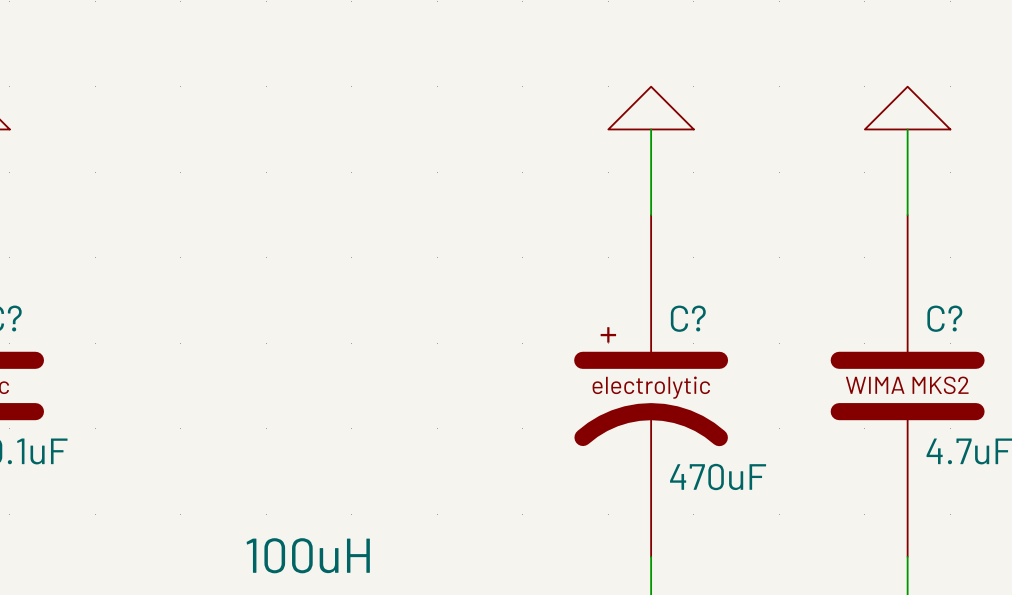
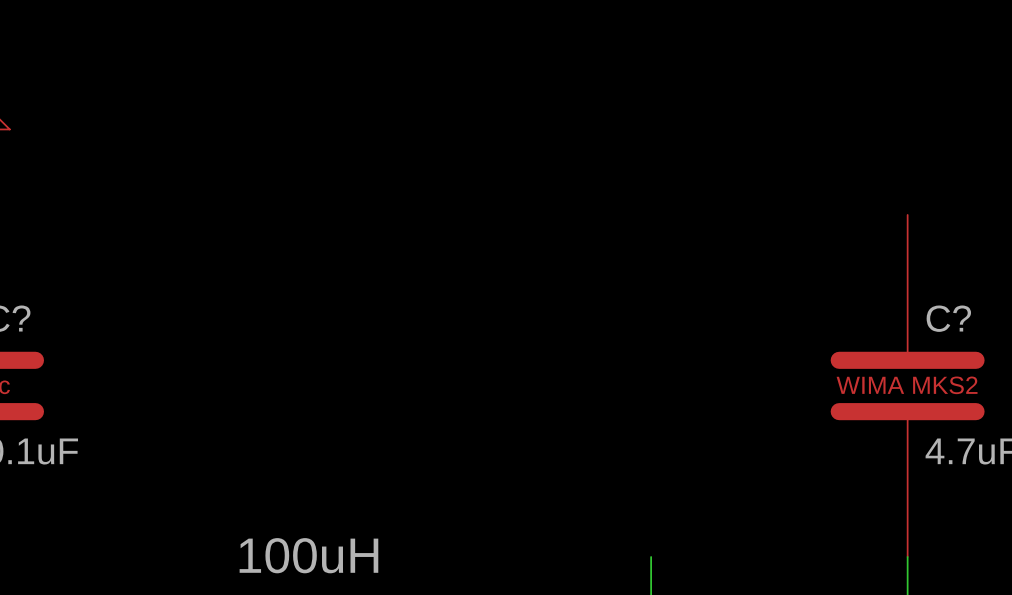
power symbol: (651, 108) -> none
power symbol: (907, 108) -> none
wire: (651, 129) (651, 214) -> none
wire: (907, 129) (907, 214) -> none
C?: 470uF (651, 385) -> none

